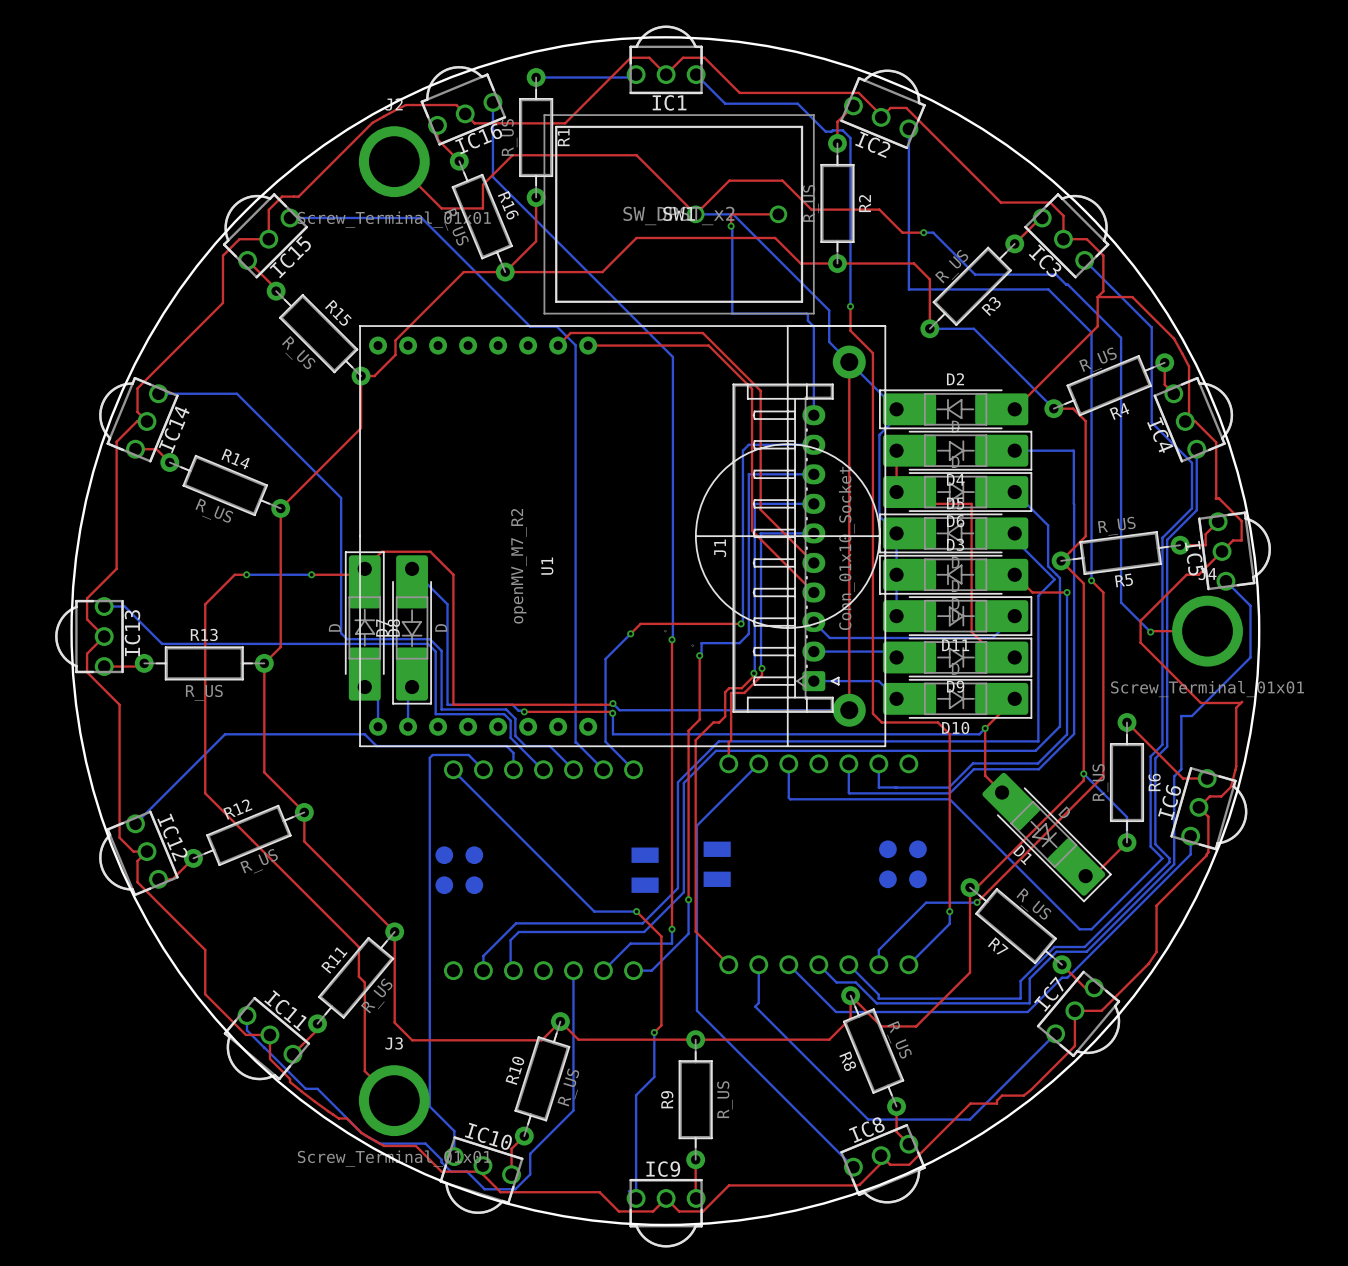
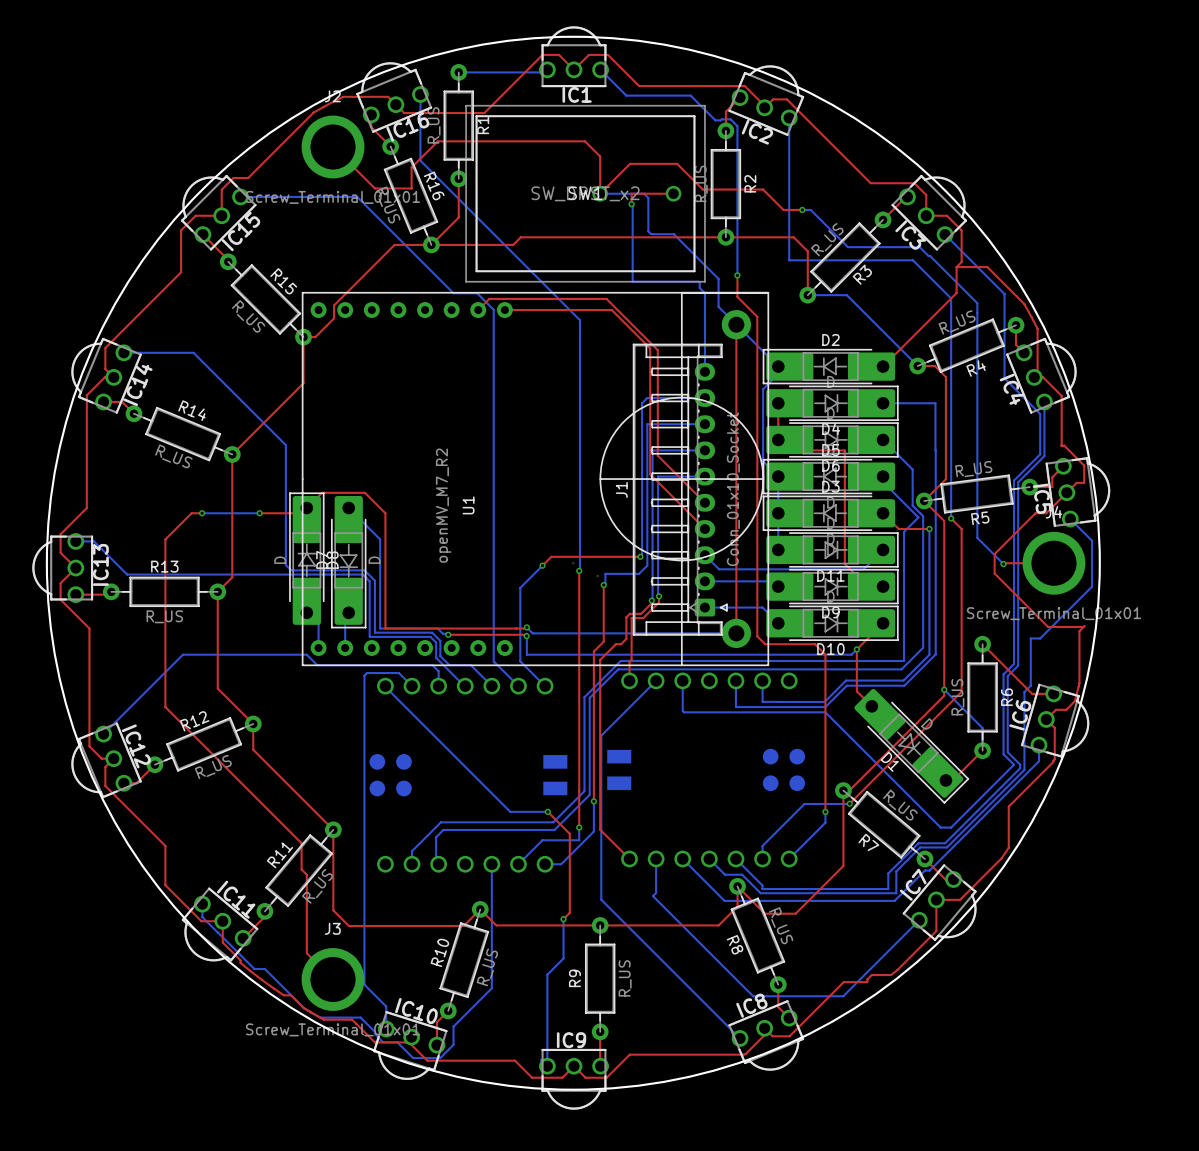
top track: (636, 155) (695, 214) -> (547, 141) (584, 141) (600, 156) (600, 193)
bottom track: (733, 214) (778, 260) -> (633, 193) (644, 193) (648, 197) (648, 231) (651, 234) (673, 234)
top track: (800, 263) (775, 237) (636, 237) (602, 272) (597, 272) -> (693, 237) (520, 237) (513, 244)

